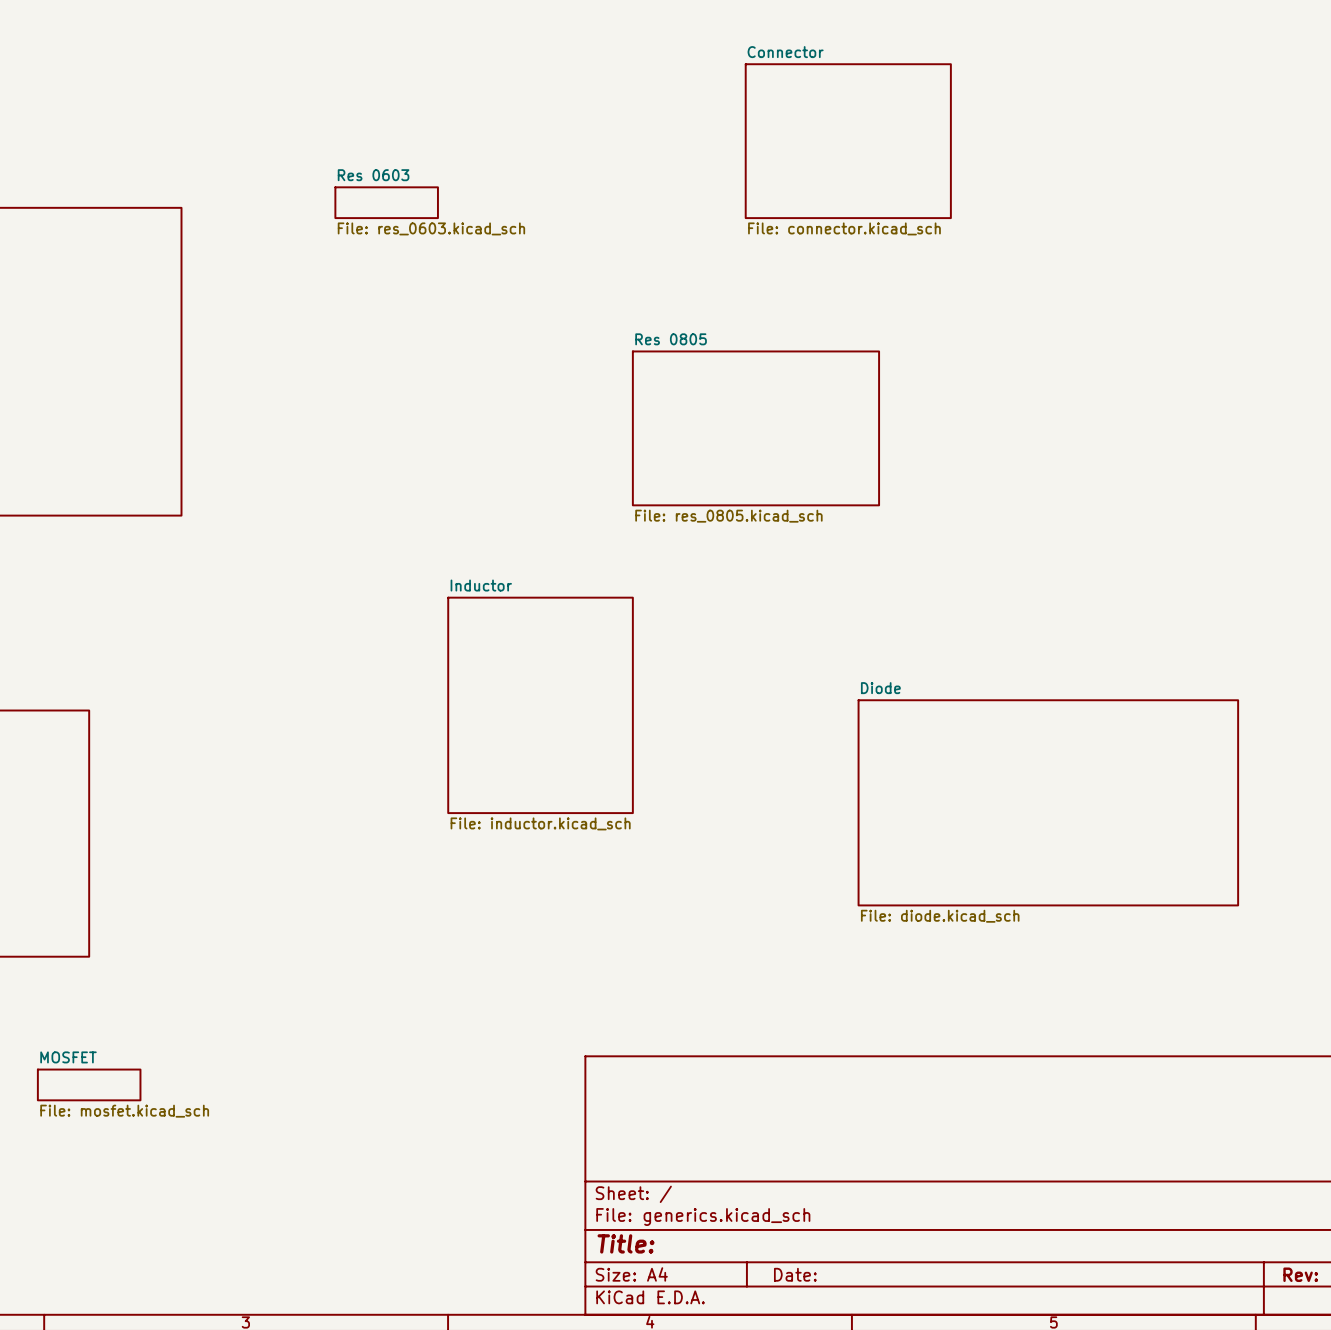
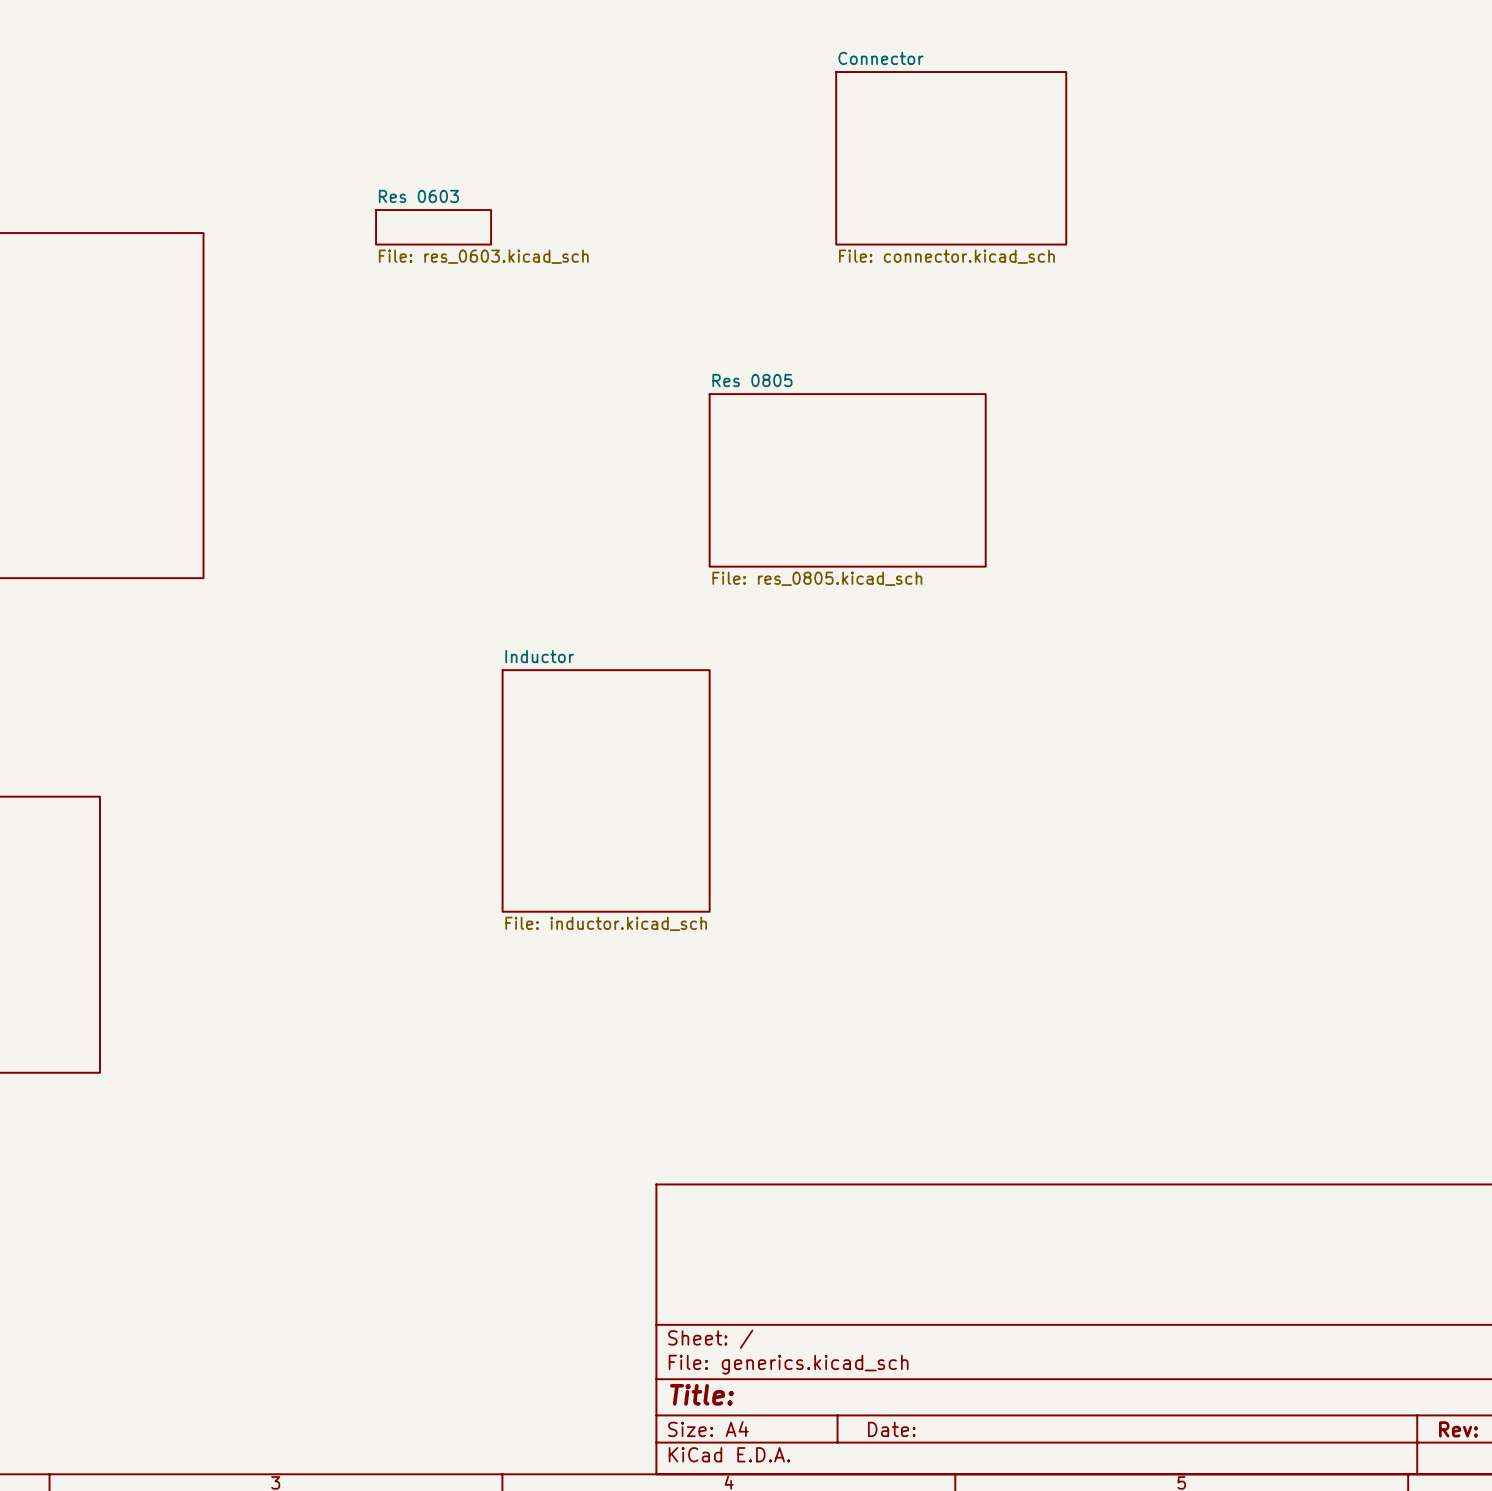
sheet Diode: File: diode.kicad_sch (1048, 802) -> none
sheet MOSFET: File: mosfet.kicad_sch (89, 1084) -> none

